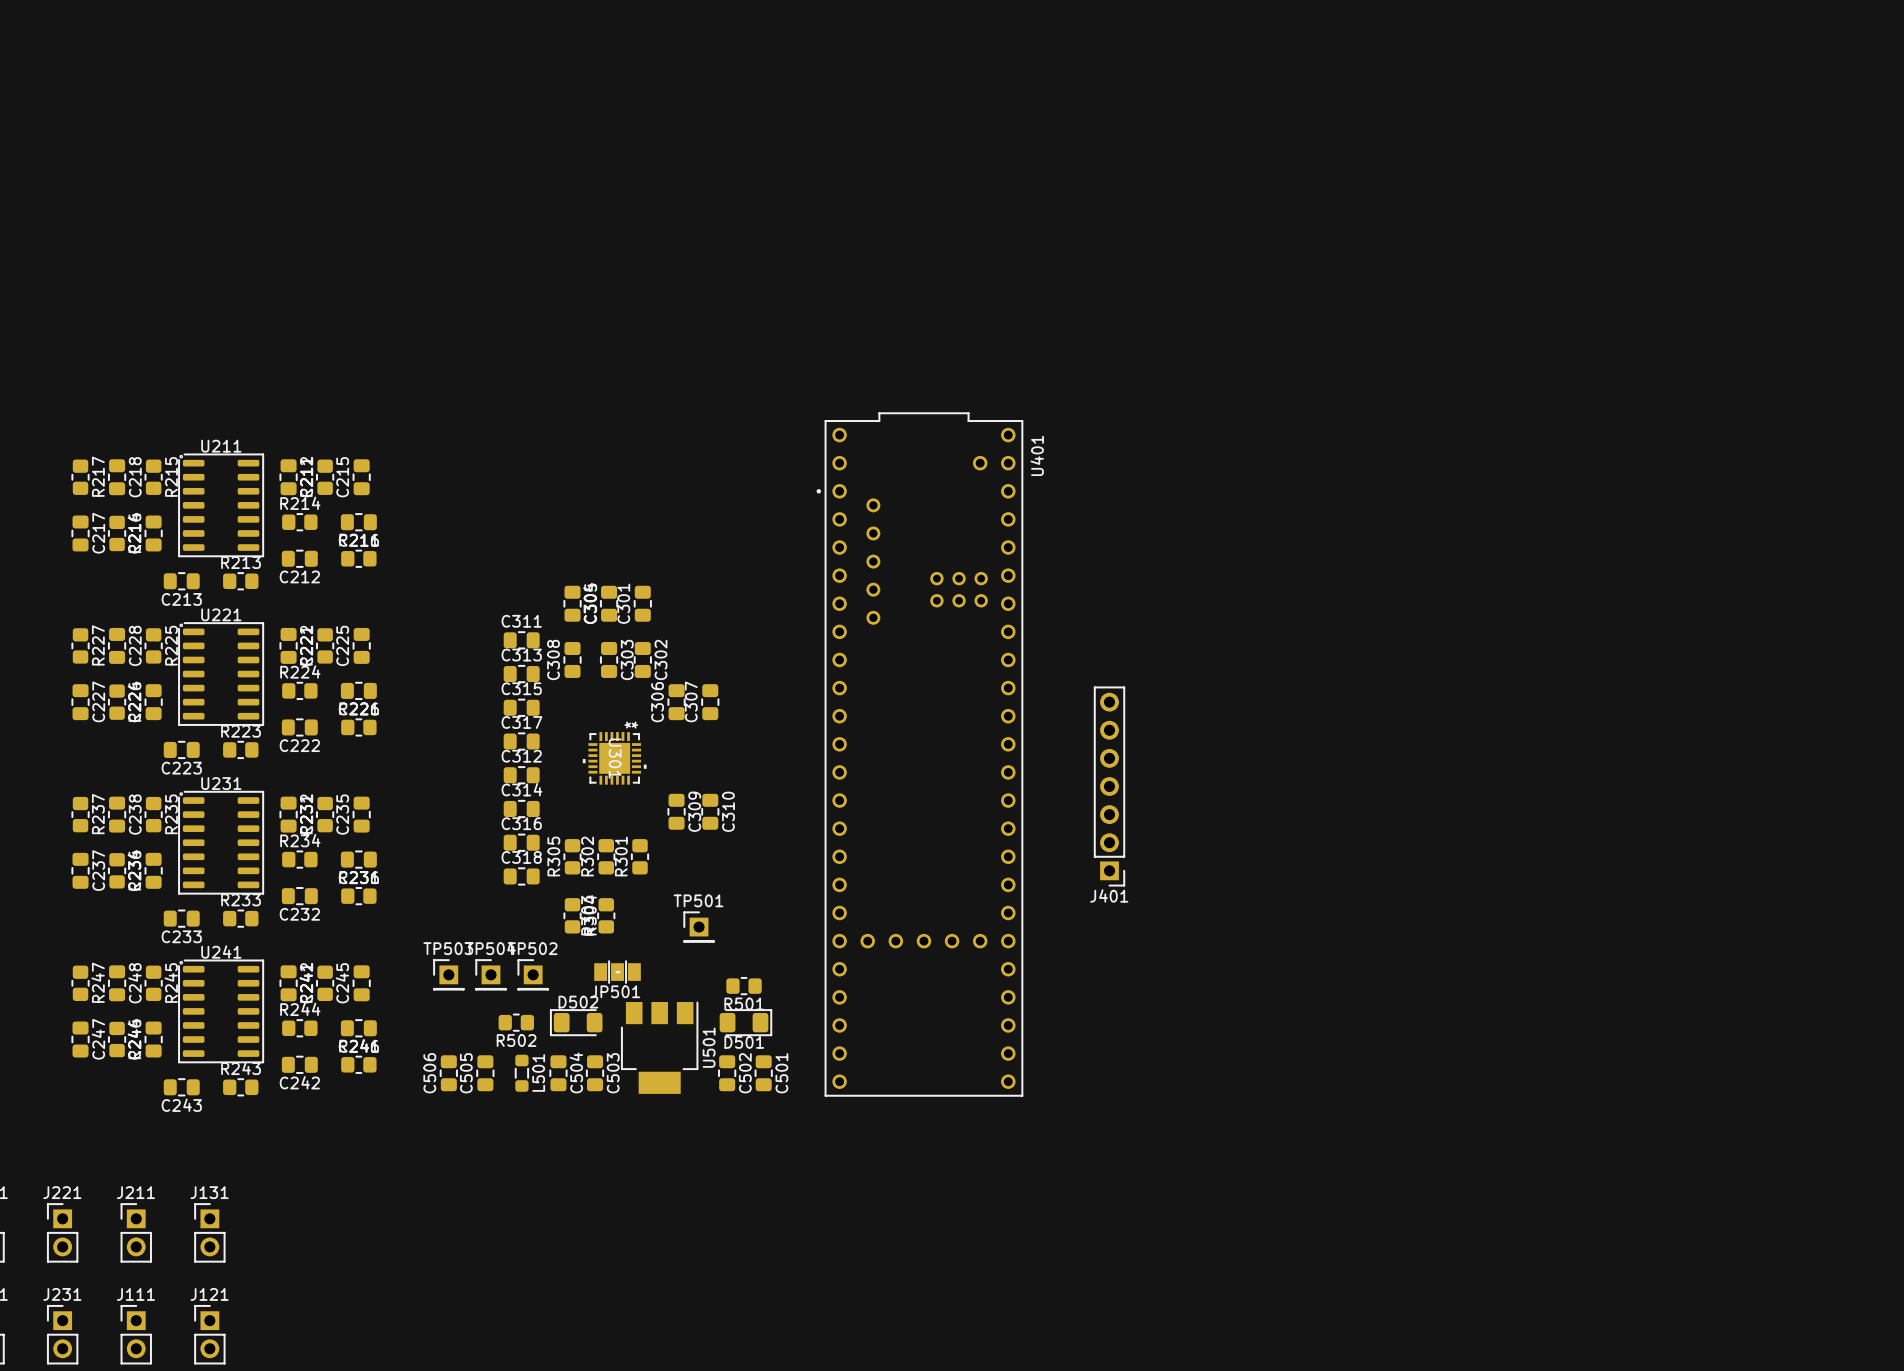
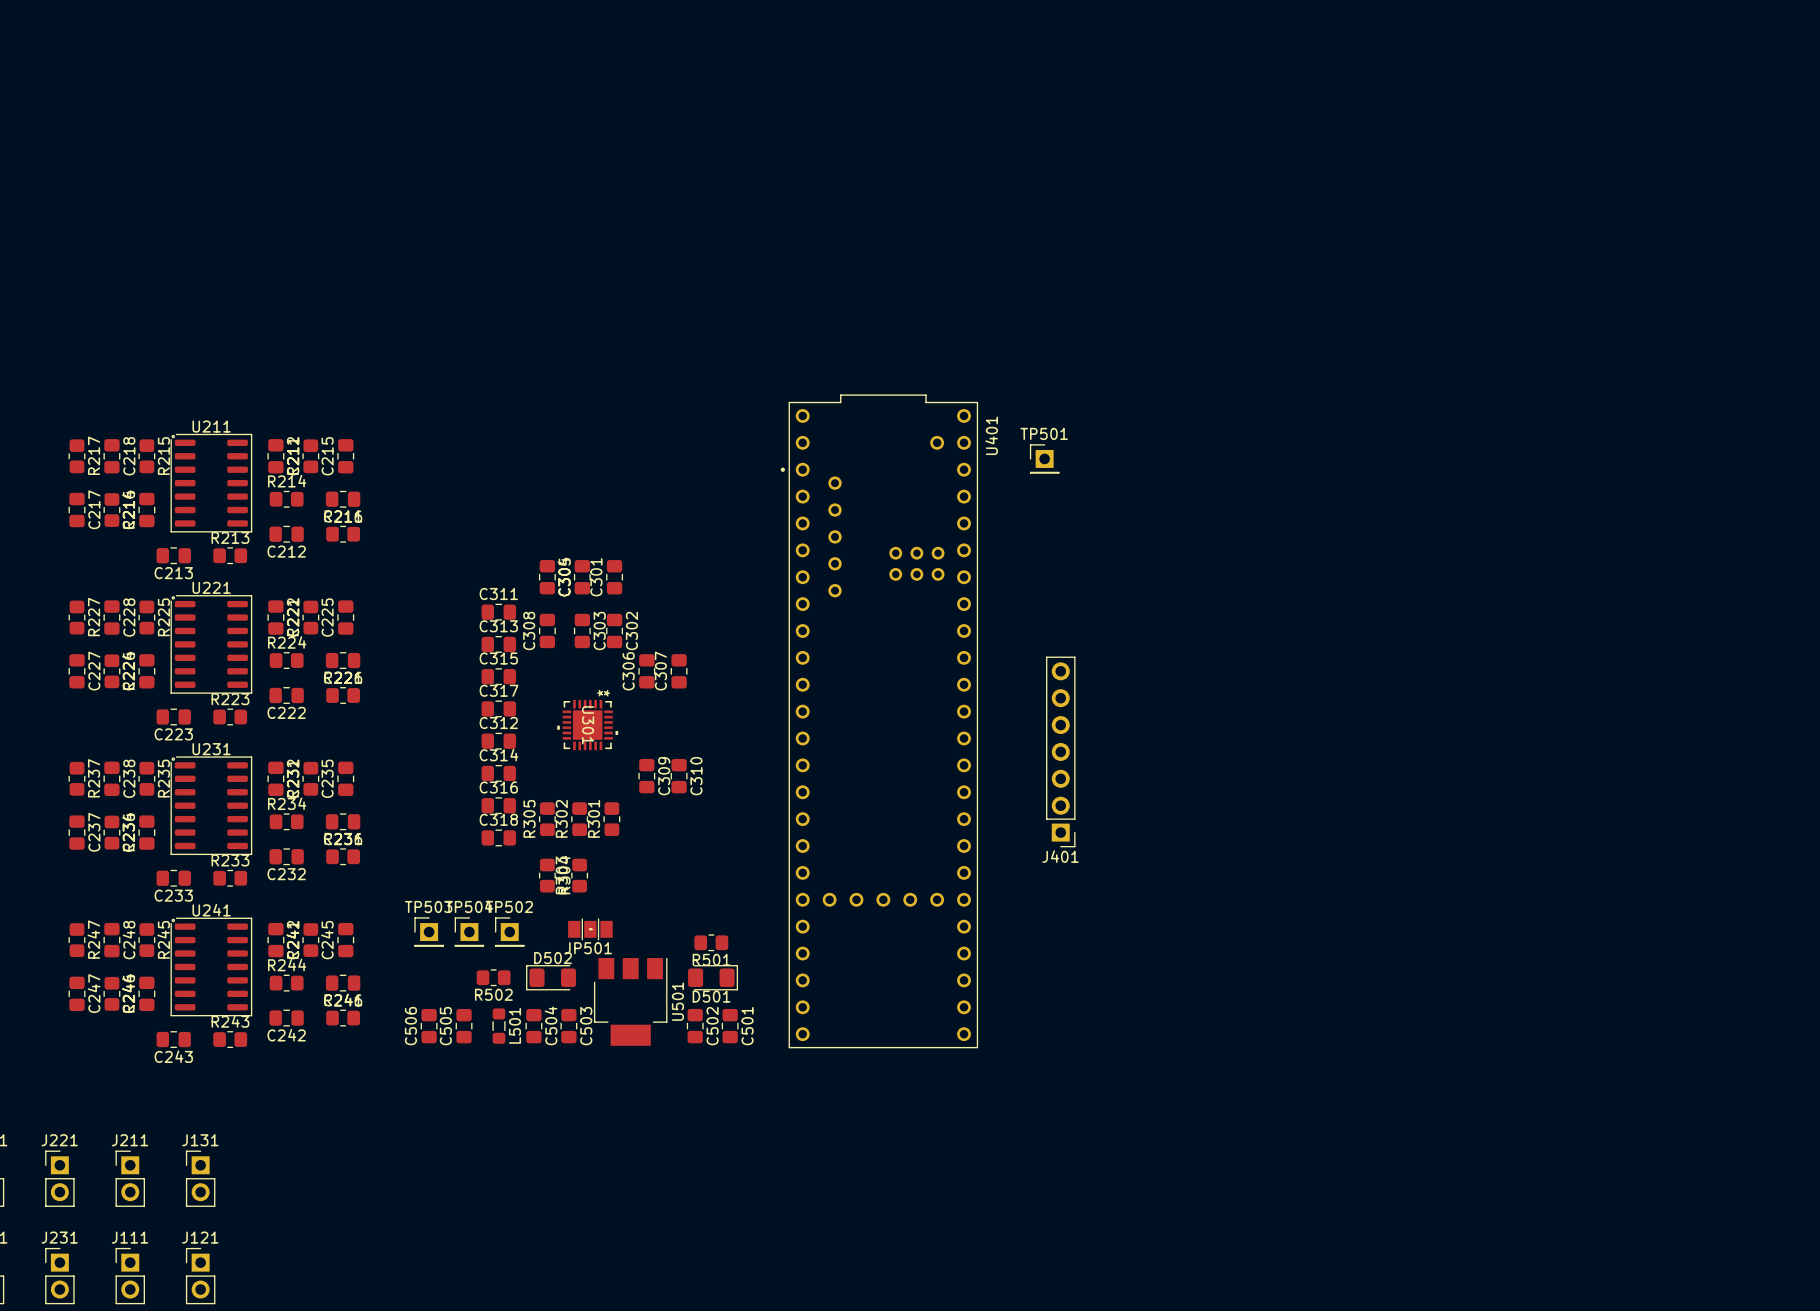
TP501 position: (699, 927) -> (1044, 458)

